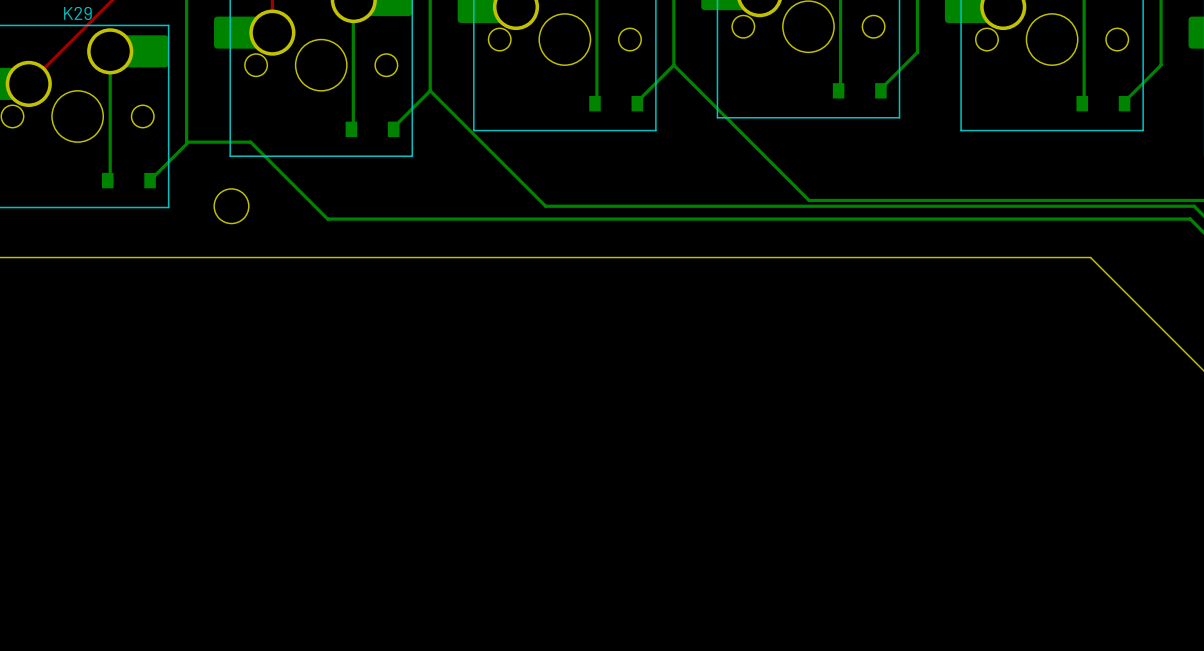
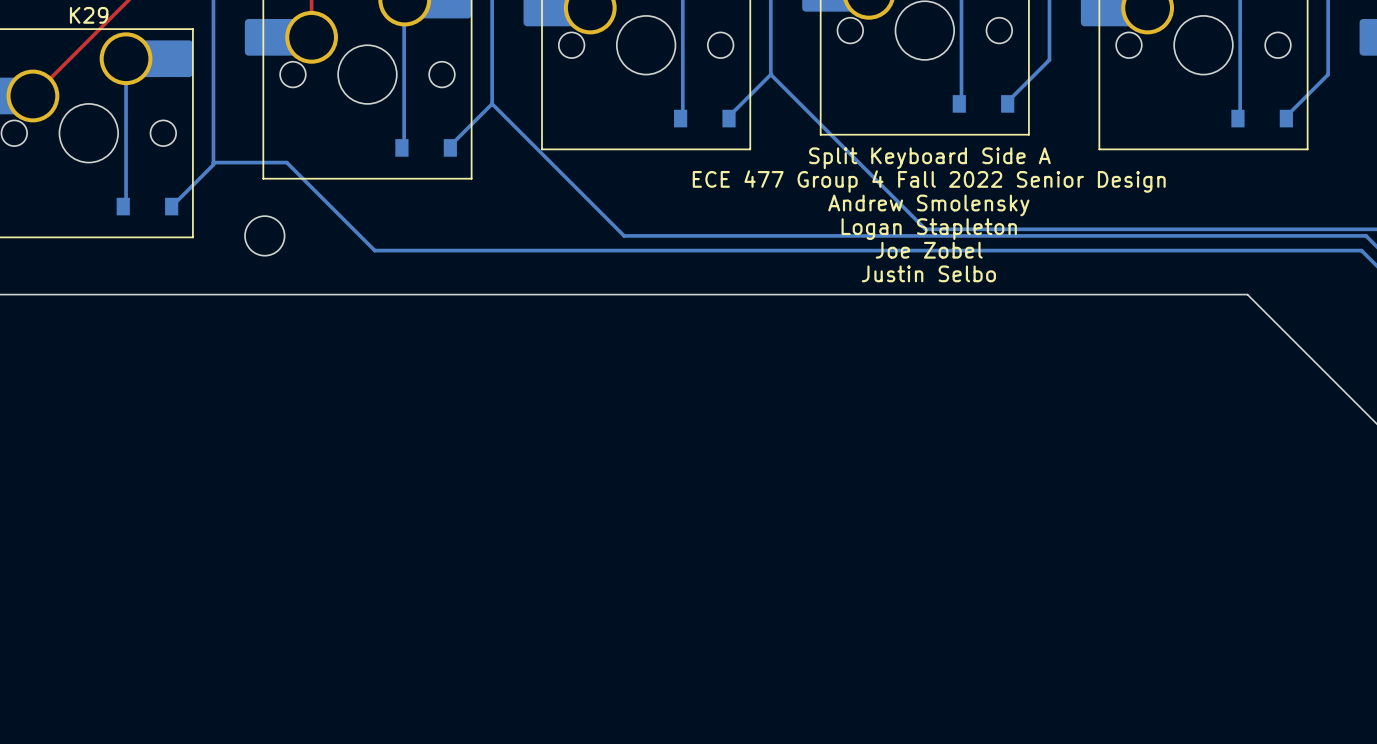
text: none -> Split Keyboard Side A (929, 158)
text: none -> ECE 477 Group 4 Fall 2022 Senior Design (929, 181)
text: none -> Andrew Smolensky (928, 205)
text: none -> Logan Stapleton (929, 229)
text: none -> Joe Zobel (929, 250)
text: none -> Justin Selbo (928, 273)

